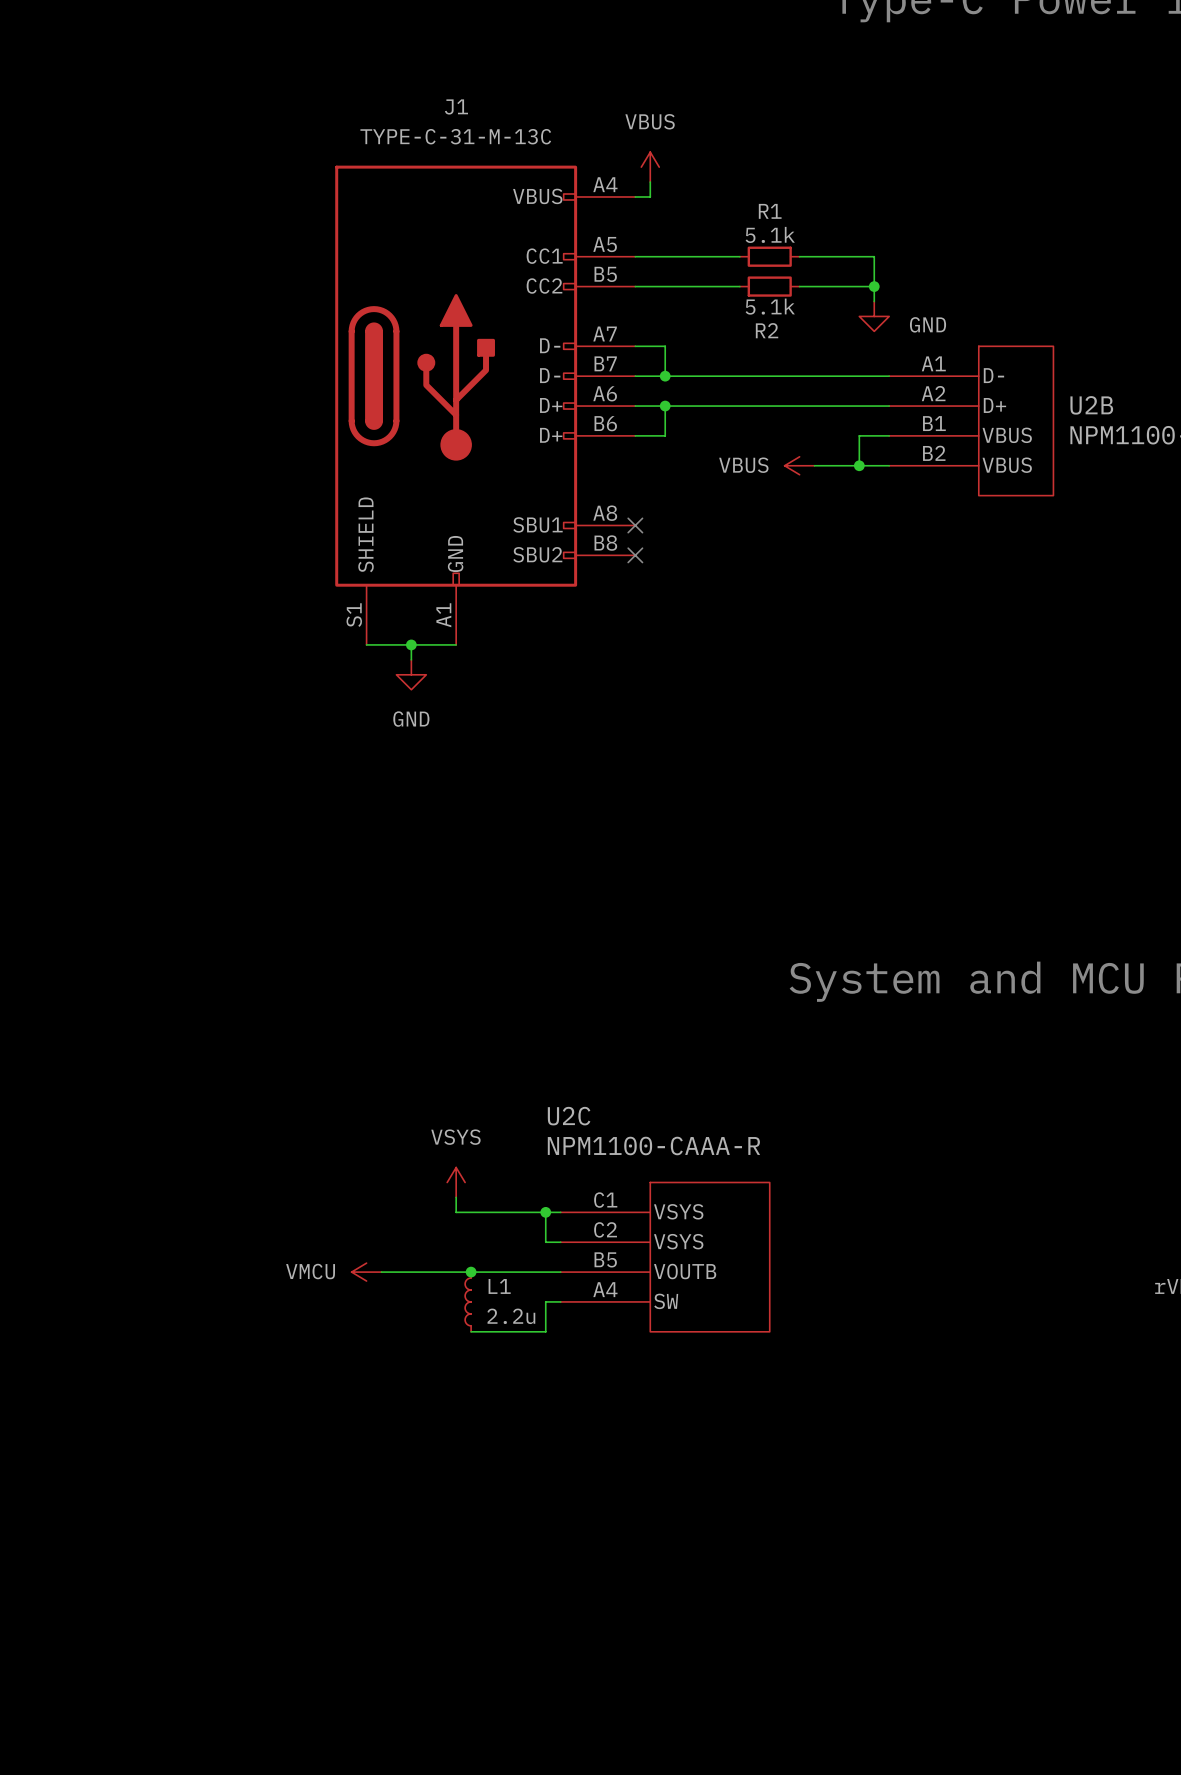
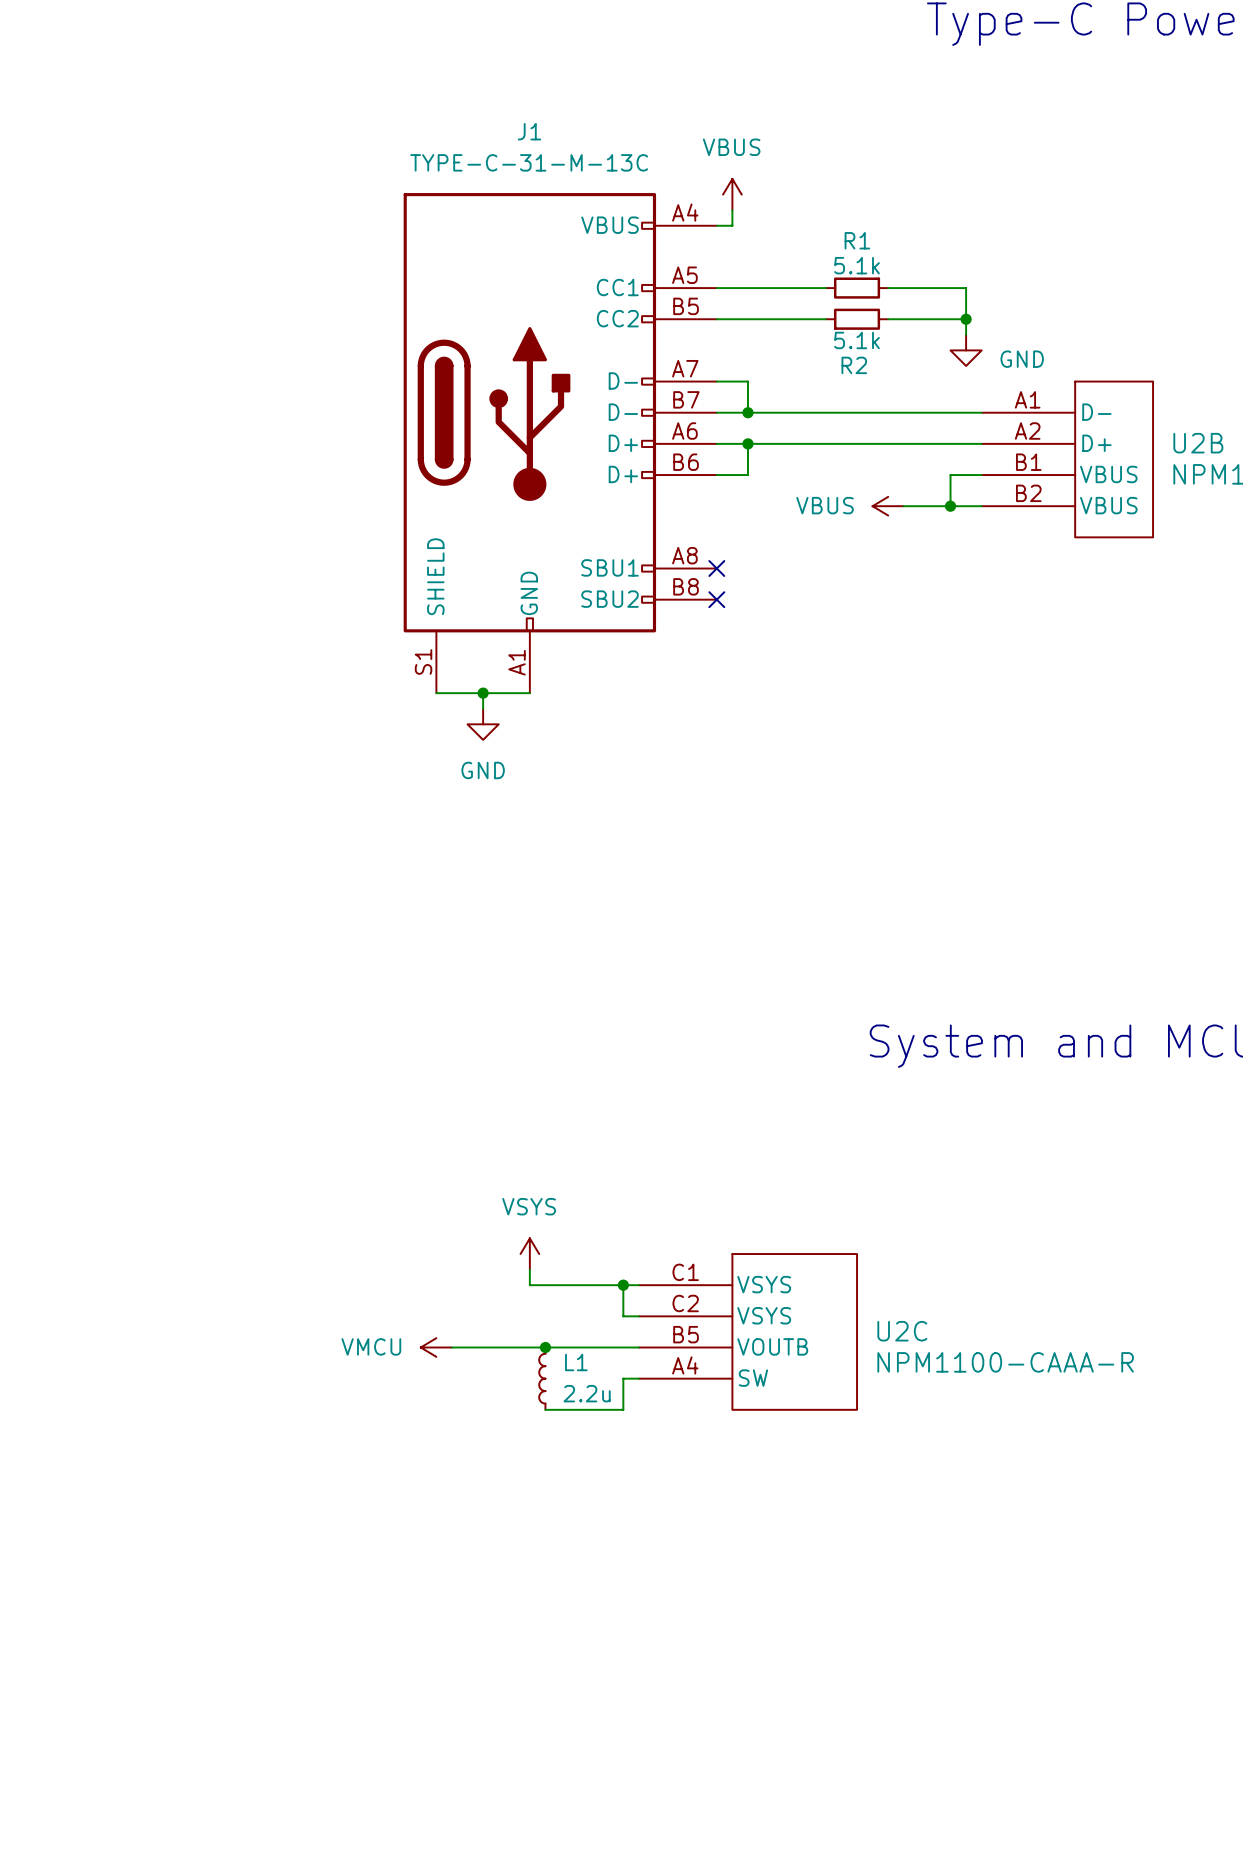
U2C name position: U2C (569, 1116) -> U2C (902, 1331)
U2C value position: NPM1100-CAAA-R (653, 1145) -> NPM1100-CAAA-R (1005, 1362)

